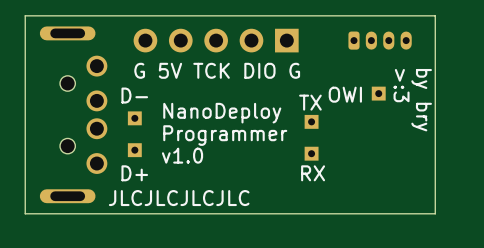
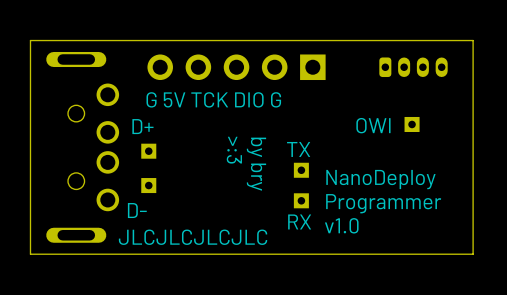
text position: >:3 (401, 85) -> >:3 (234, 150)
text: D- (134, 95) -> D+ (142, 126)
text position: by bry (421, 100) -> by bry (256, 164)
text position: TX (310, 102) -> TX (298, 149)
text position: NanoDeploy (222, 113) -> NanoDeploy (380, 179)
part: (311, 121) -> none
text position: Programmer (225, 135) -> Programmer (383, 203)
part: none -> (301, 170)
part: (311, 153) -> none
text position: v1.0 (182, 155) -> v1.0 (341, 225)
part: none -> (301, 200)
text: D+ (134, 173) -> D- (137, 210)
text position: RX (313, 173) -> RX (299, 221)

